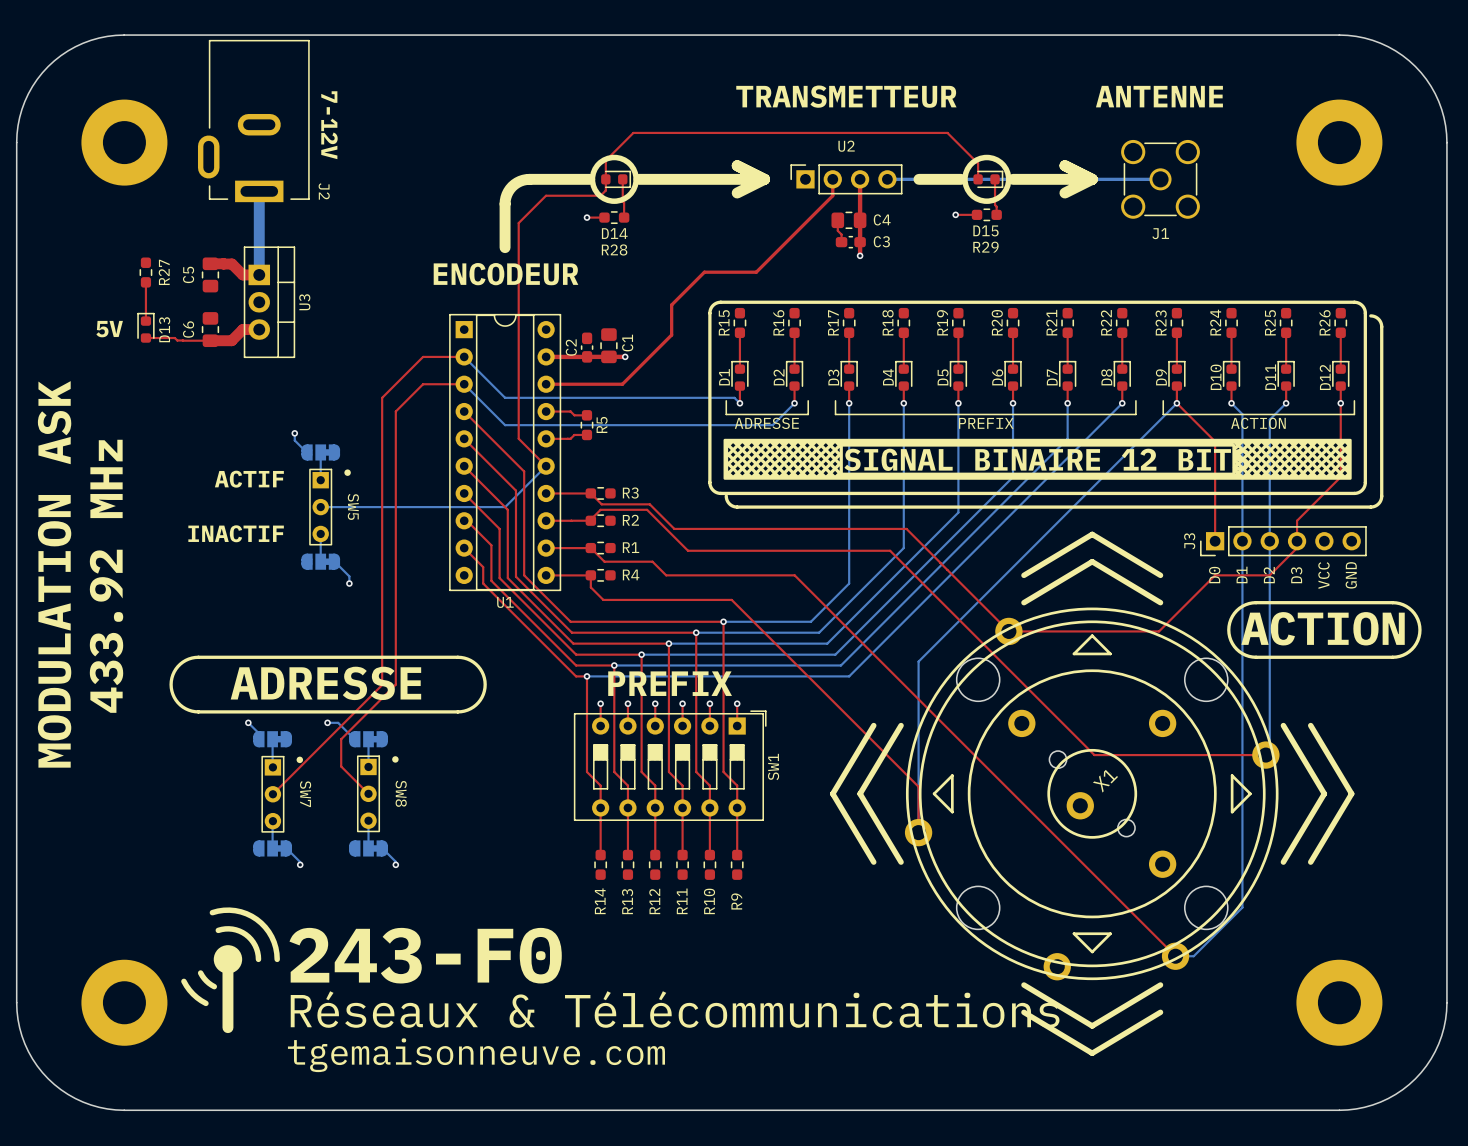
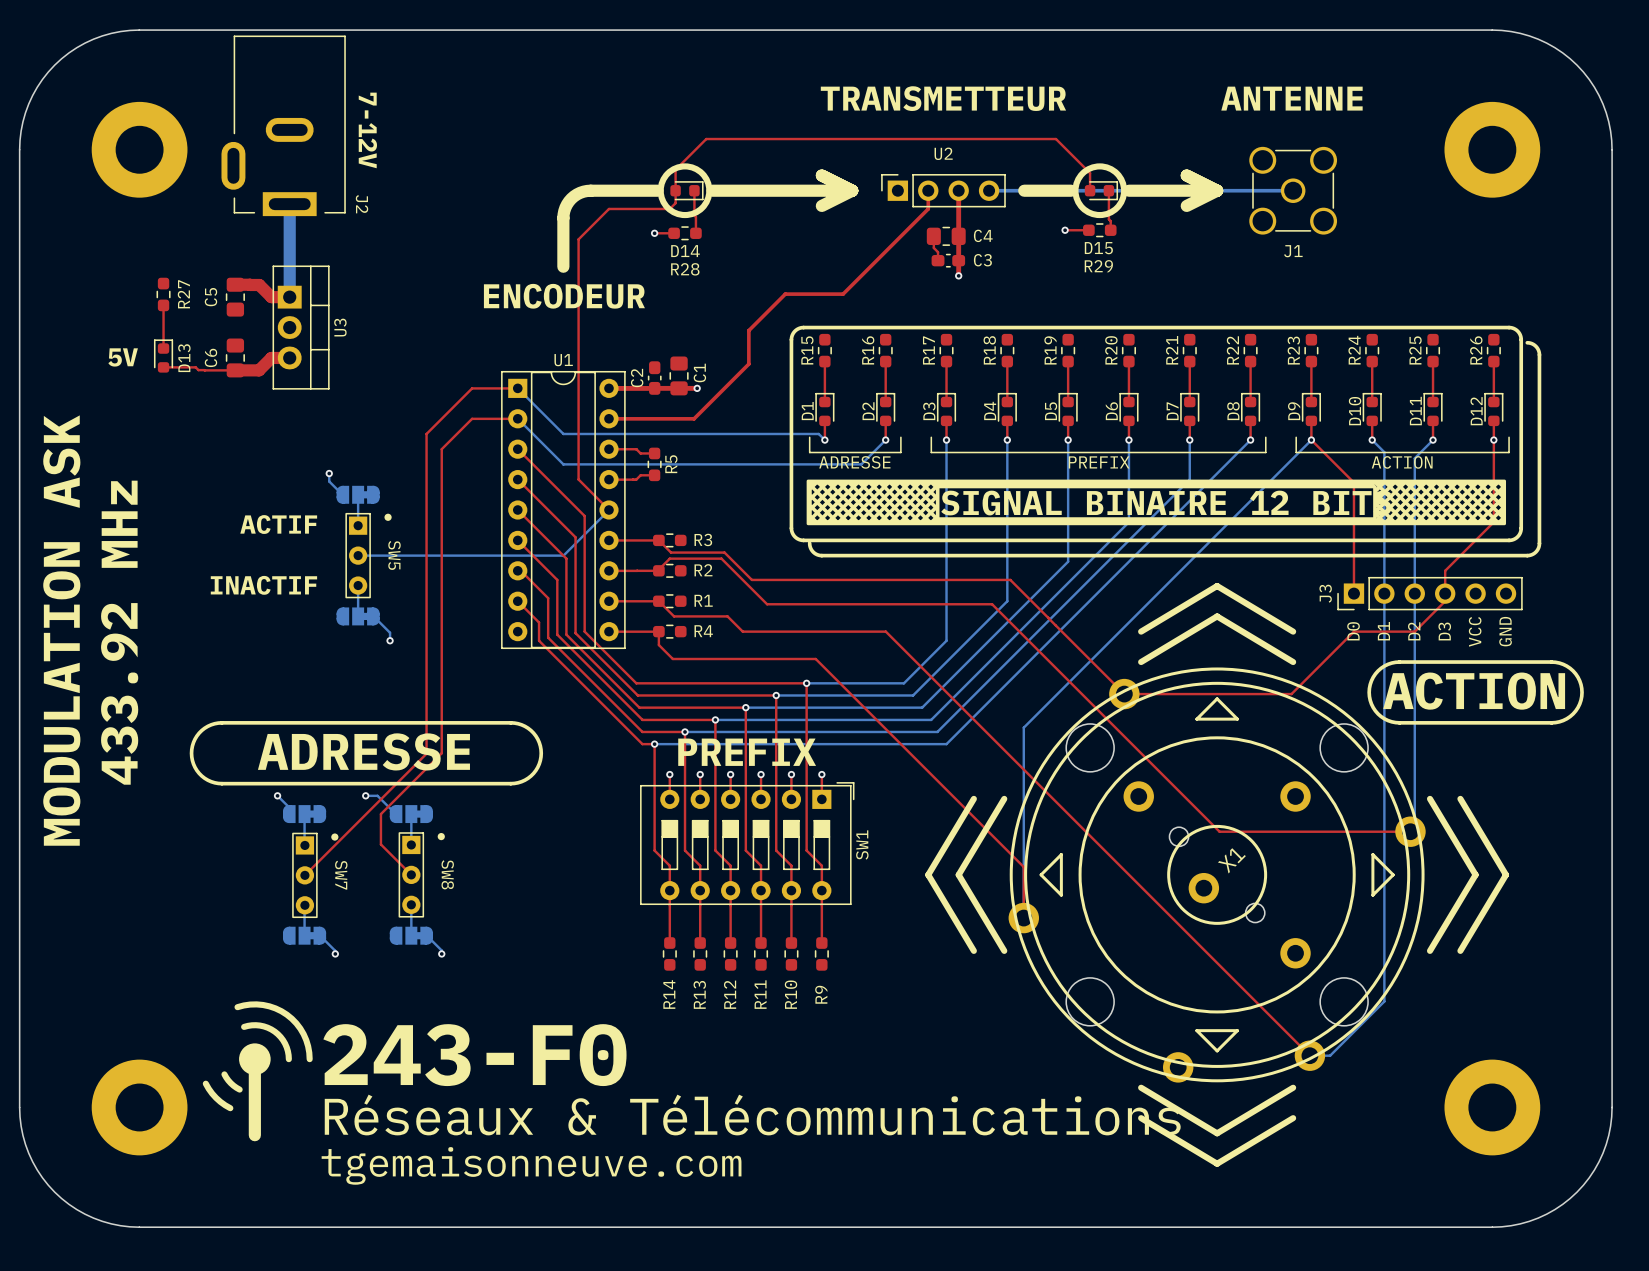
U1 footprint: [449, 314, 562, 592] -> [501, 371, 626, 649]
U1 name position: U1 (505, 602) -> U1 (563, 360)

